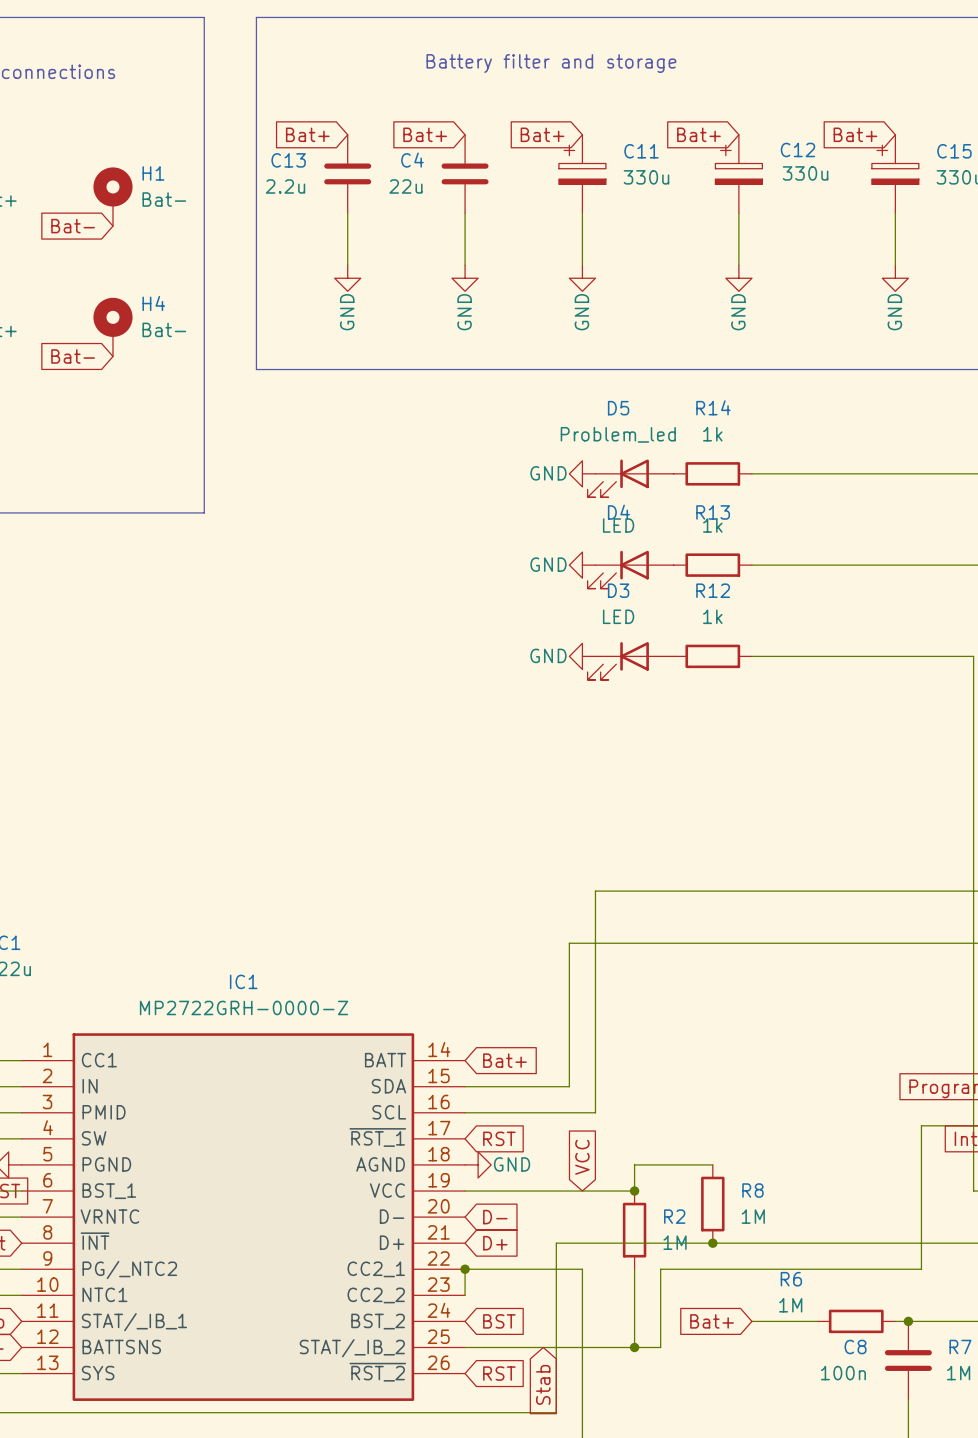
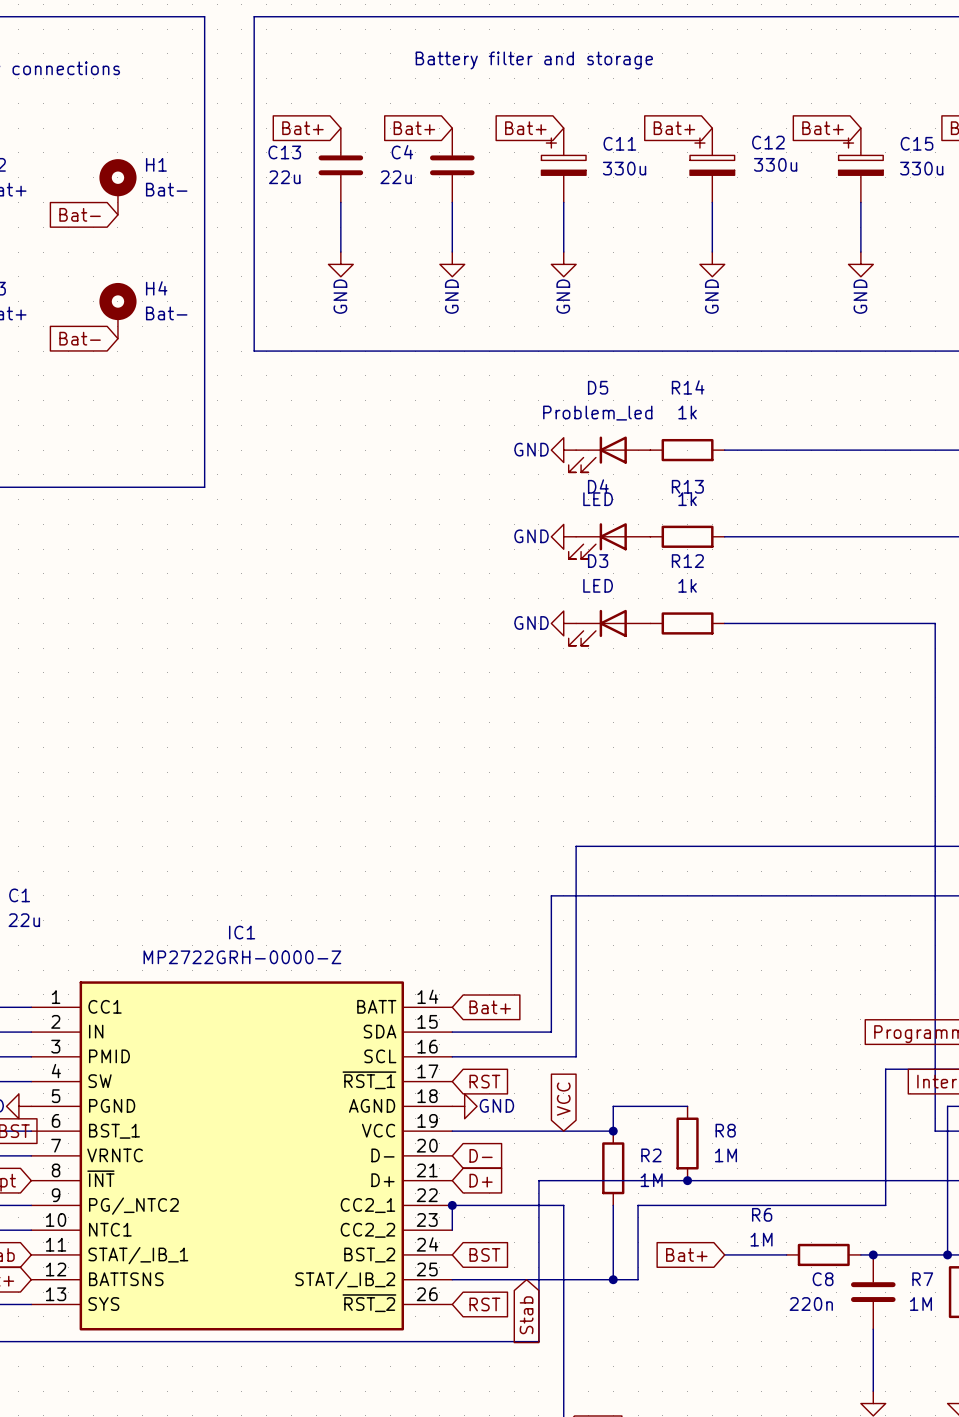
C13 value: 2.2u (285, 186) -> 22u (284, 177)
C8 value: 100n (843, 1373) -> 220n (811, 1304)

